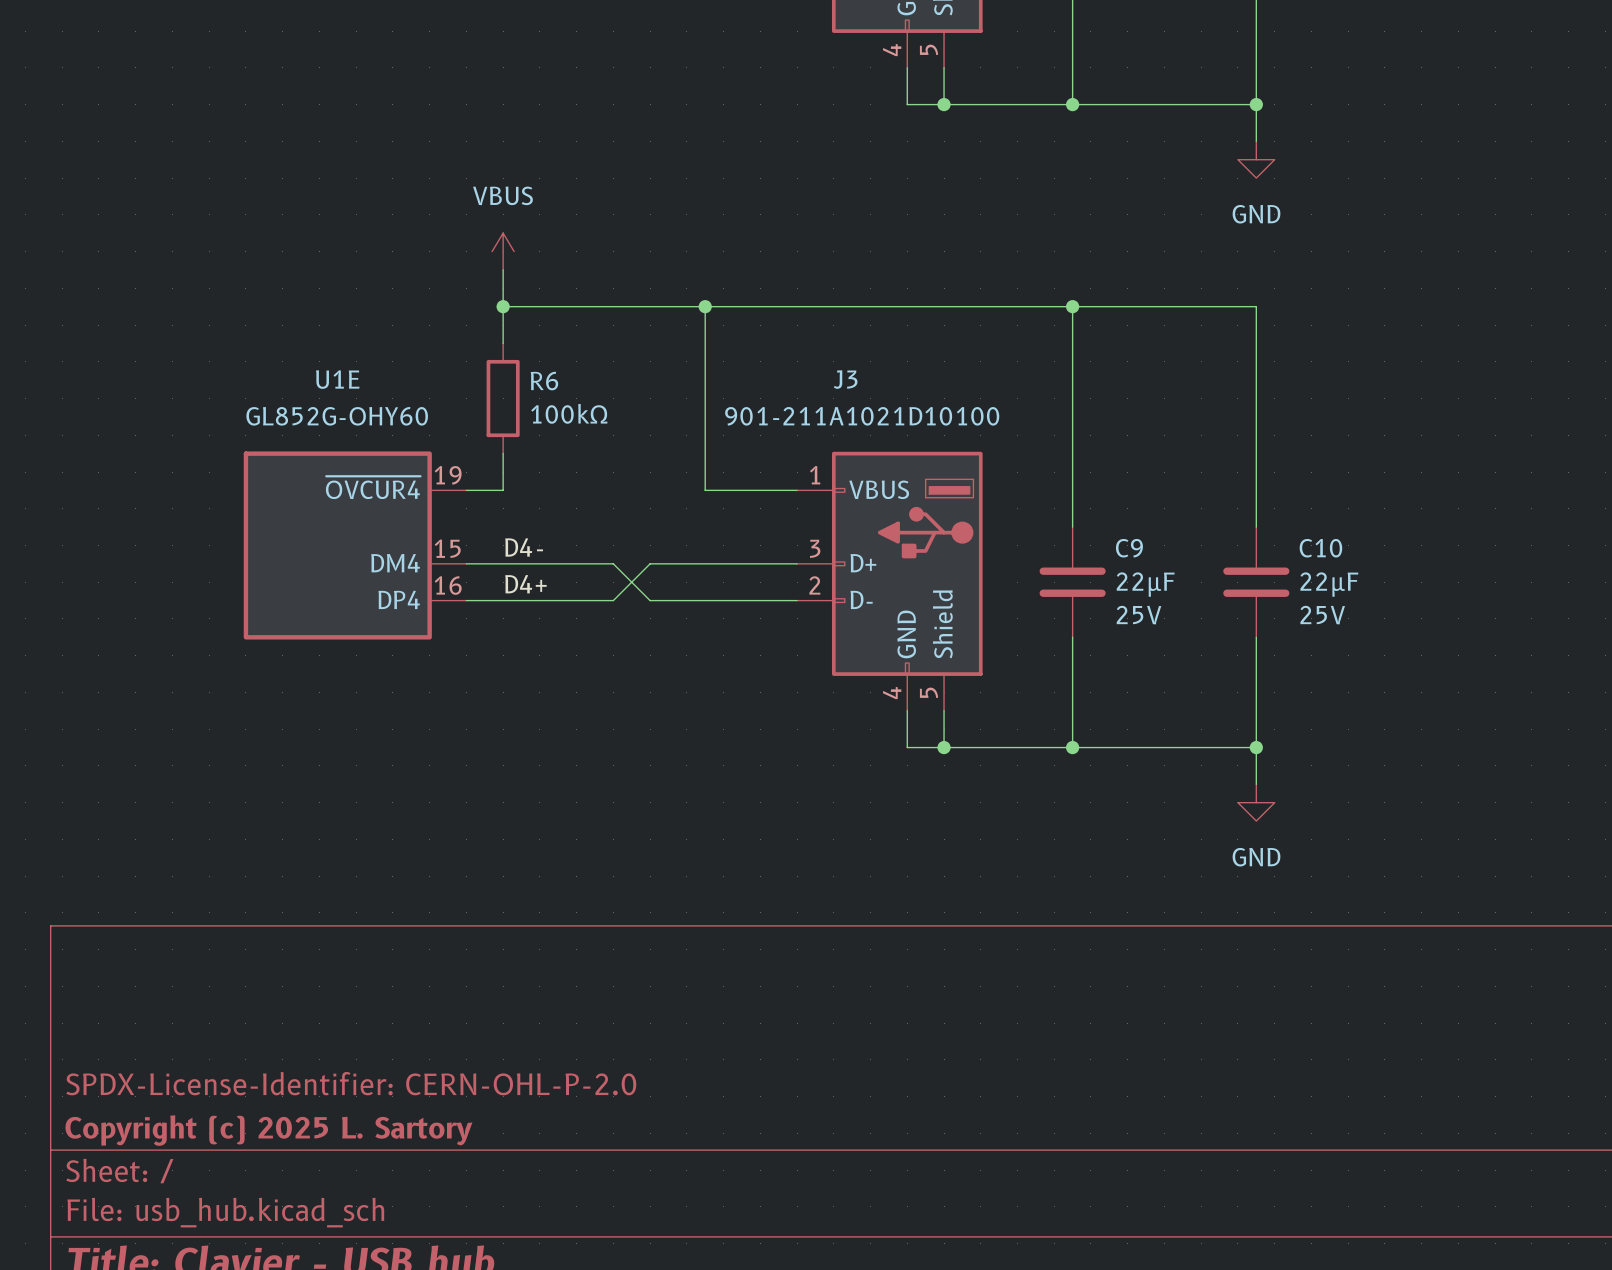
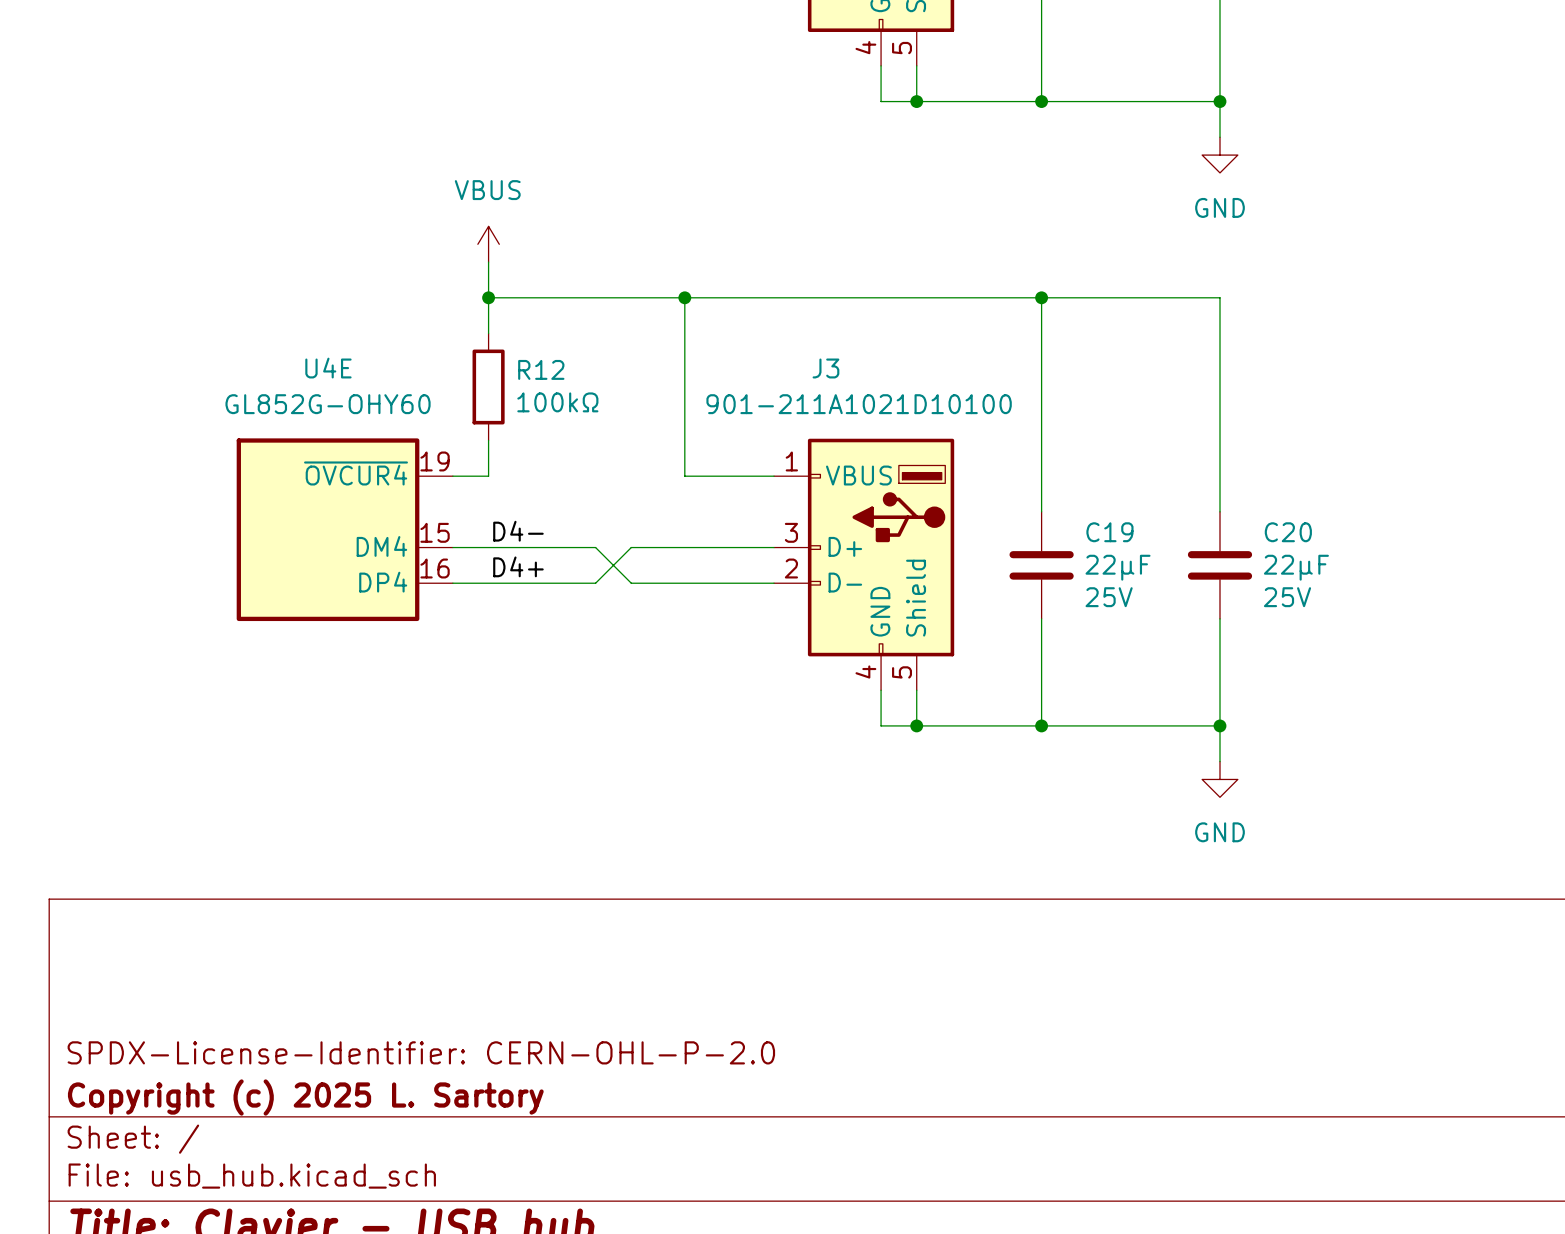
U1E name: U1E (337, 379) -> U4E (328, 368)
R6 name: R6 (544, 381) -> R12 (541, 369)
C9 name: C9 (1129, 548) -> C19 (1109, 532)
C10 name: C10 (1320, 548) -> C20 (1288, 532)

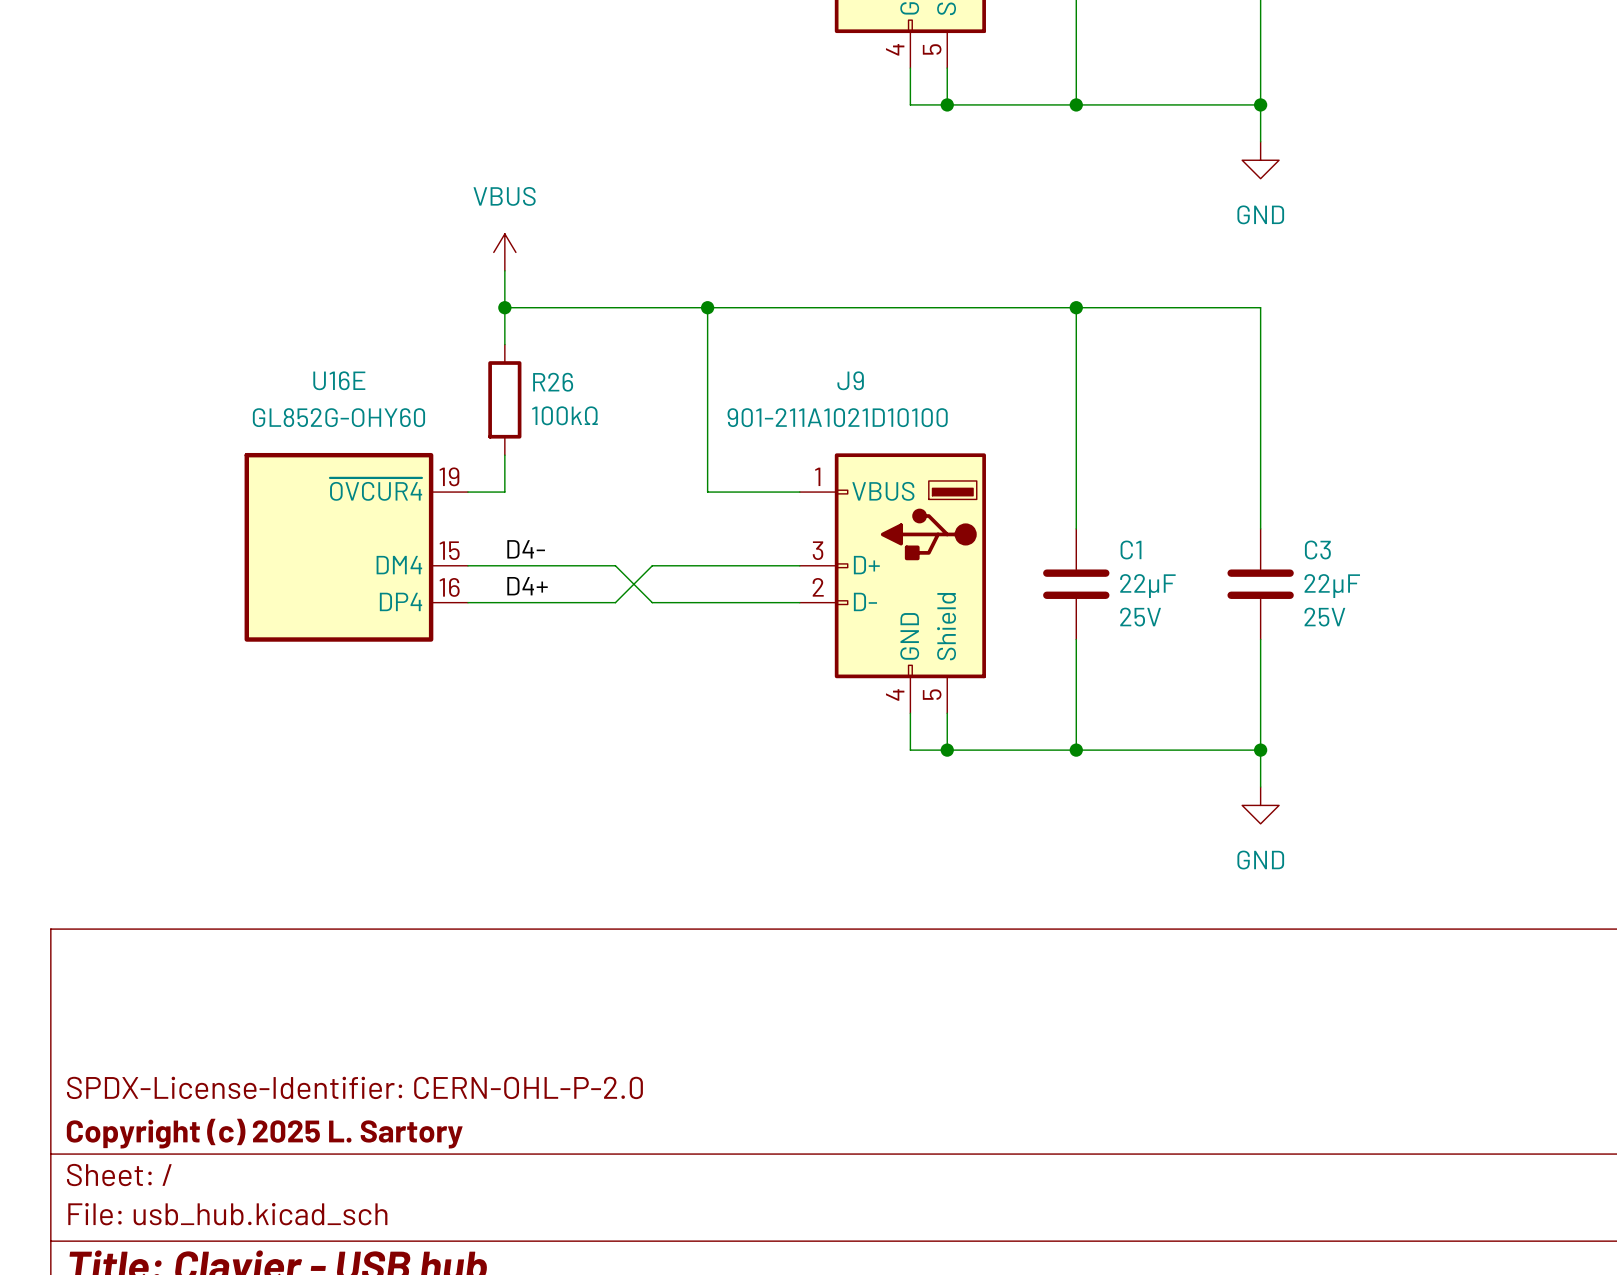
U4E name: U4E (328, 368) -> U16E (339, 380)
J3 name: J3 (825, 368) -> J9 (850, 380)
R12 name: R12 (541, 369) -> R26 (553, 382)
C19 name: C19 (1109, 532) -> C1 (1131, 549)
C20 name: C20 (1288, 532) -> C3 (1317, 549)

